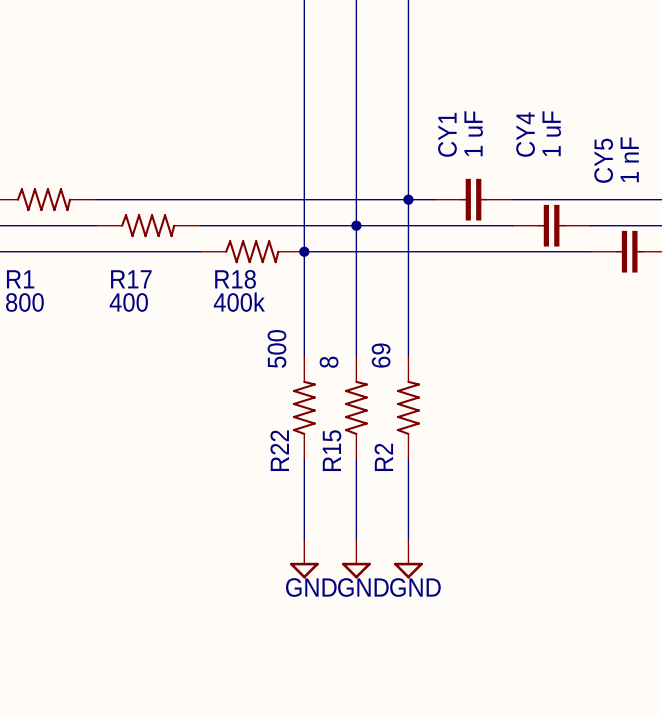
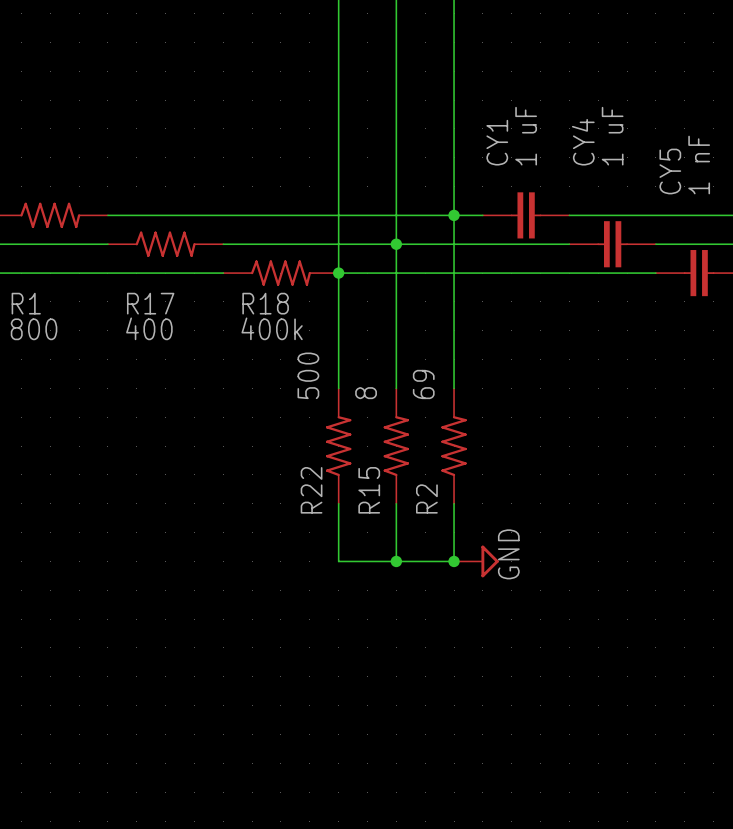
wire: (304, 512) (304, 538) -> (338, 561) (454, 561)
wire: (356, 512) (356, 538) -> none
junction: none -> (396, 561)
wire: (408, 512) (408, 538) -> none
junction: none -> (454, 561)
power symbol: none -> GND (476, 561)
power symbol: GND (304, 558) -> none
power symbol: GND (356, 558) -> none
power symbol: GND (408, 558) -> none

